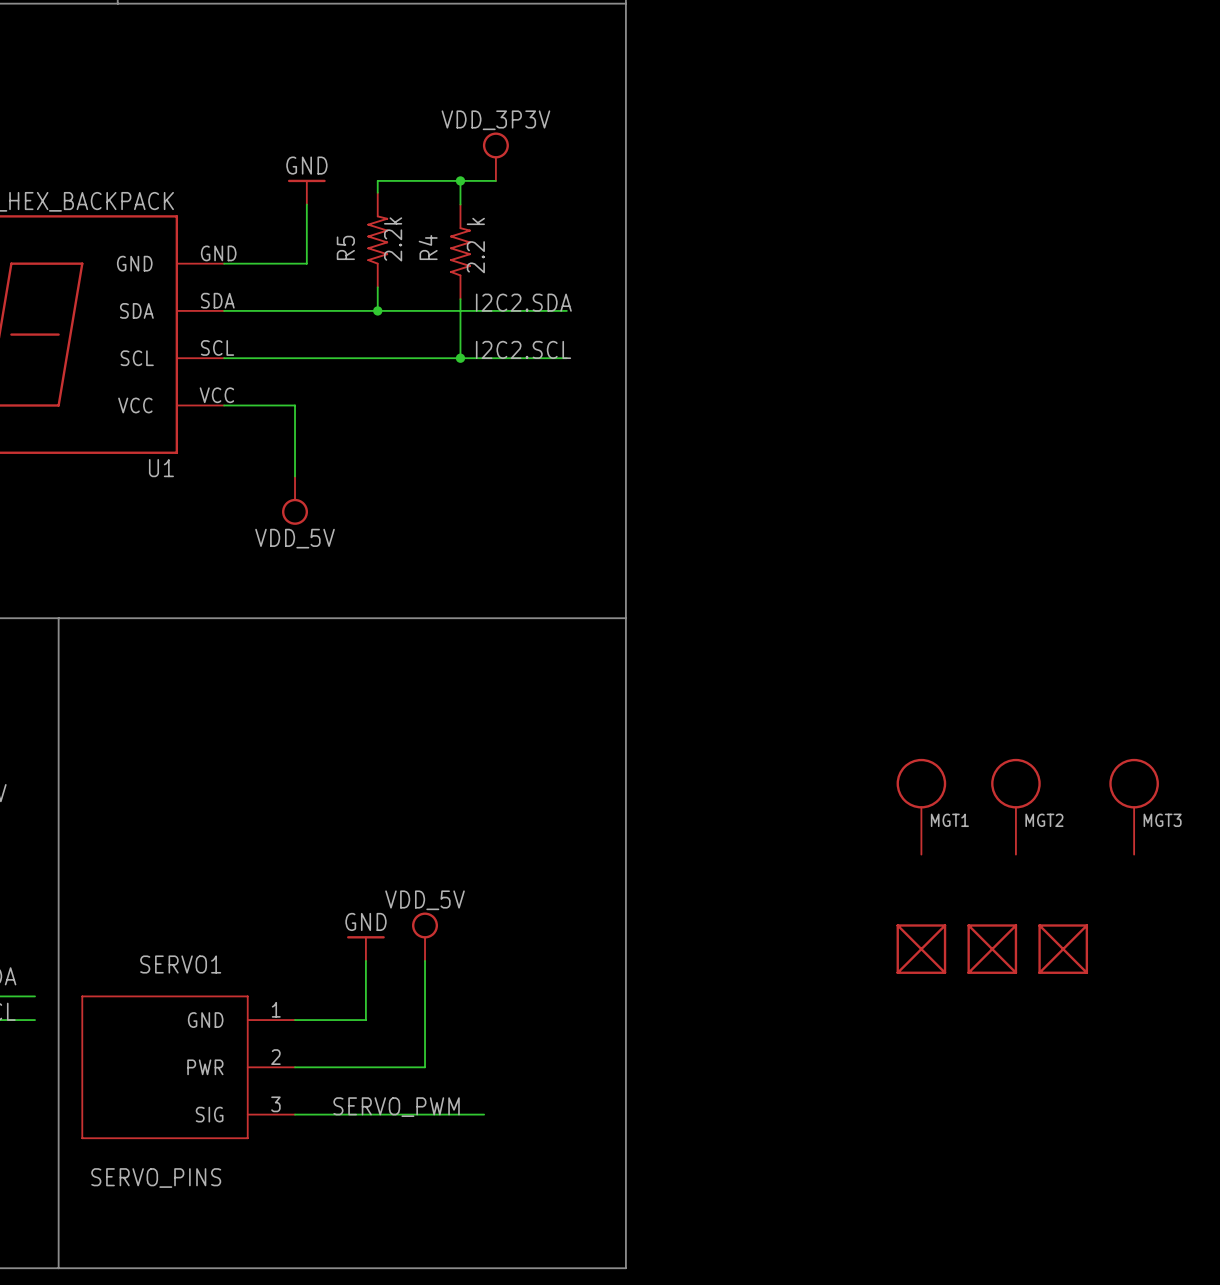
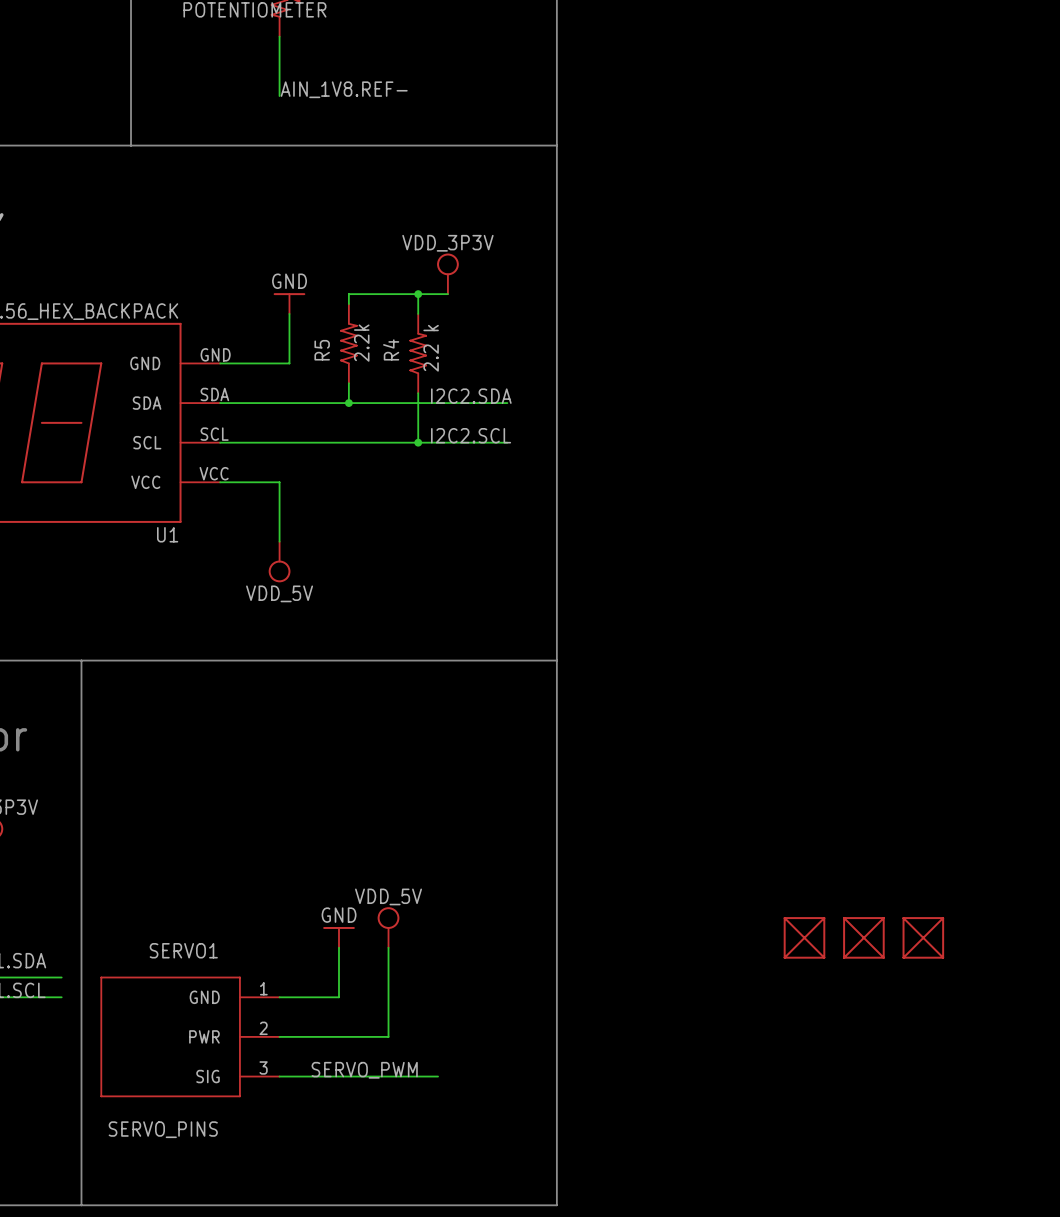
MGT1: (921, 806) -> none
MGT2: (1015, 806) -> none
MGT3: (1134, 806) -> none

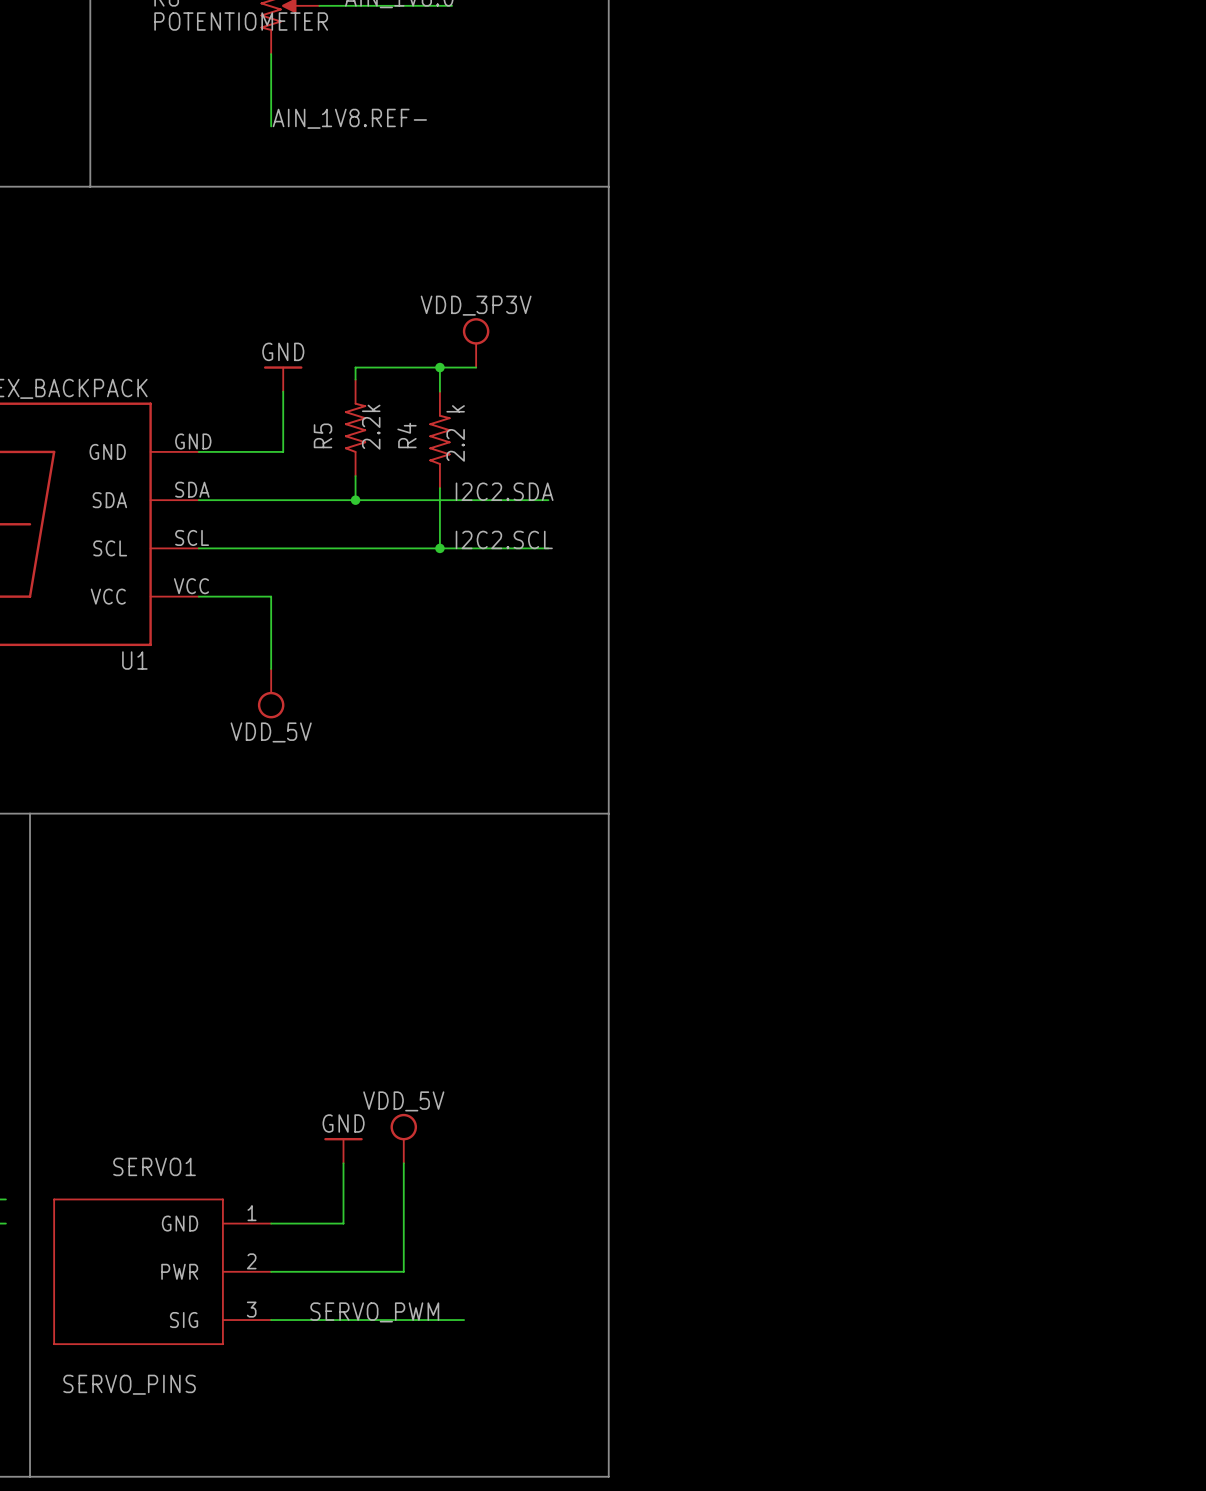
part: (804, 937) -> none
part: (863, 937) -> none
part: (923, 937) -> none

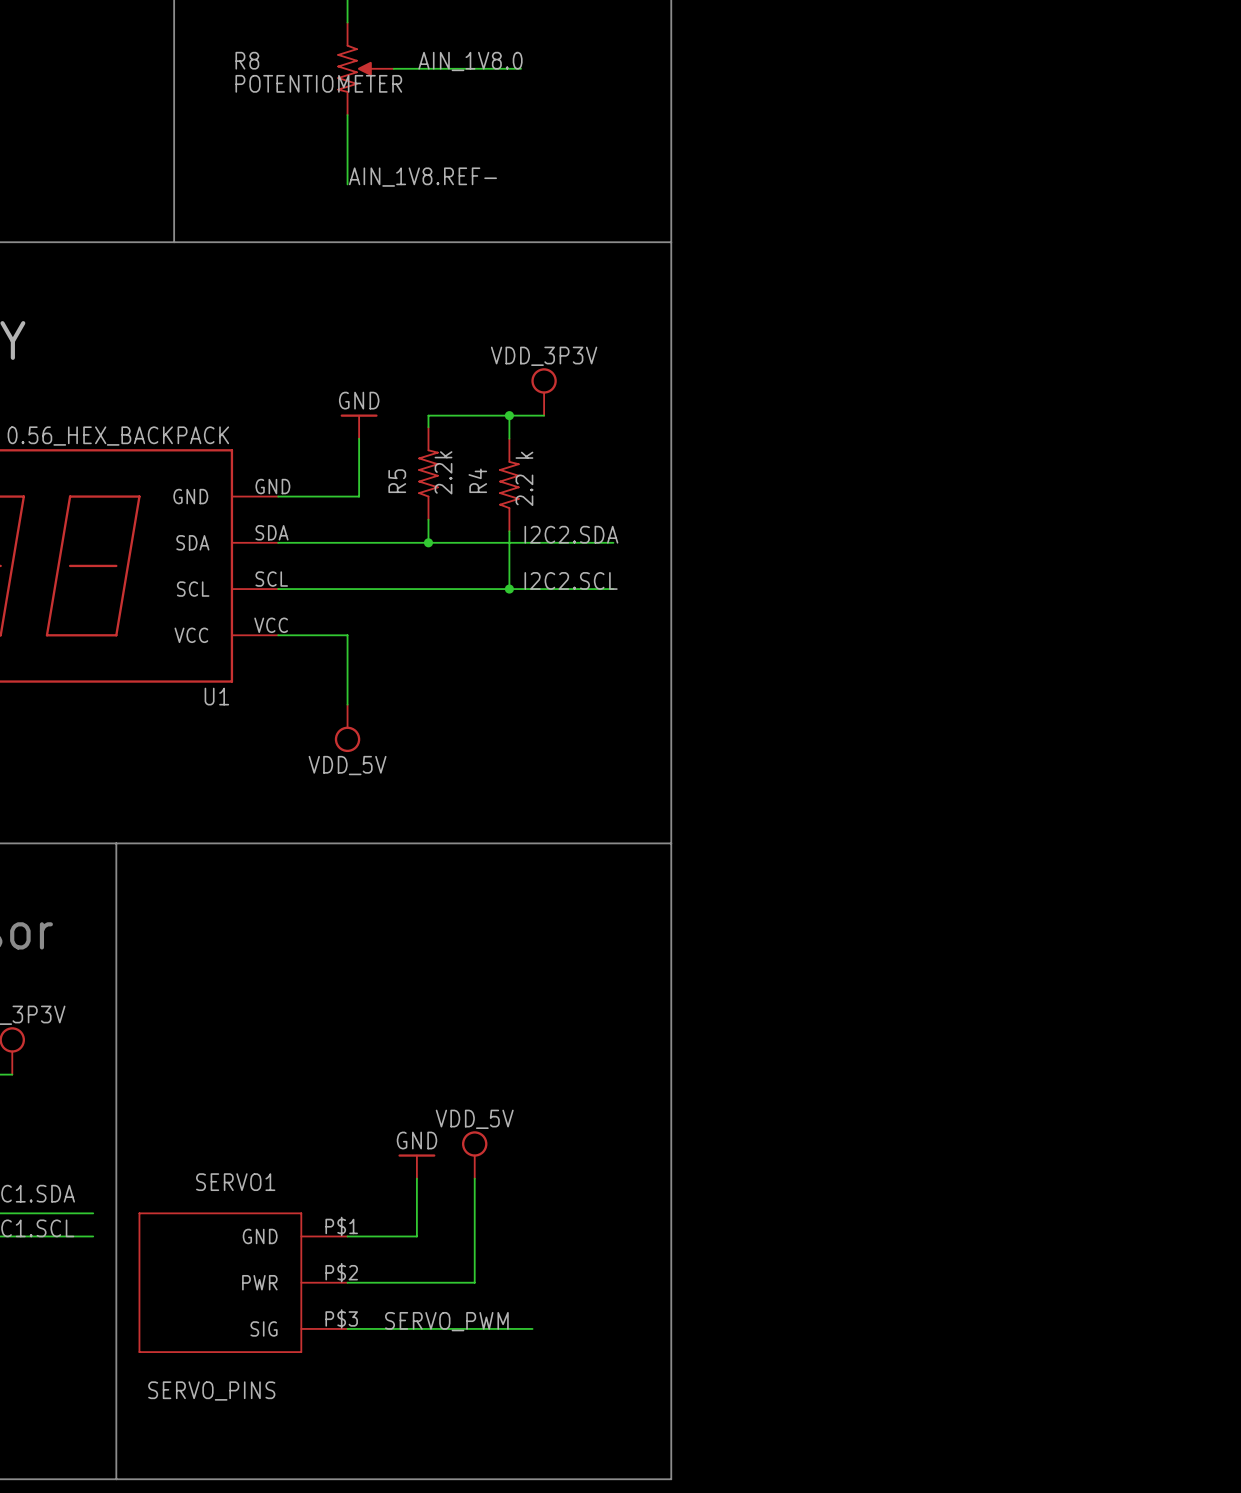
SERVO1 pin number: 1 (252, 1213) -> P$1 (341, 1226)
SERVO1 pin number: 2 (251, 1261) -> P$2 (341, 1272)
SERVO1 pin number: 3 (251, 1309) -> P$3 (341, 1318)

